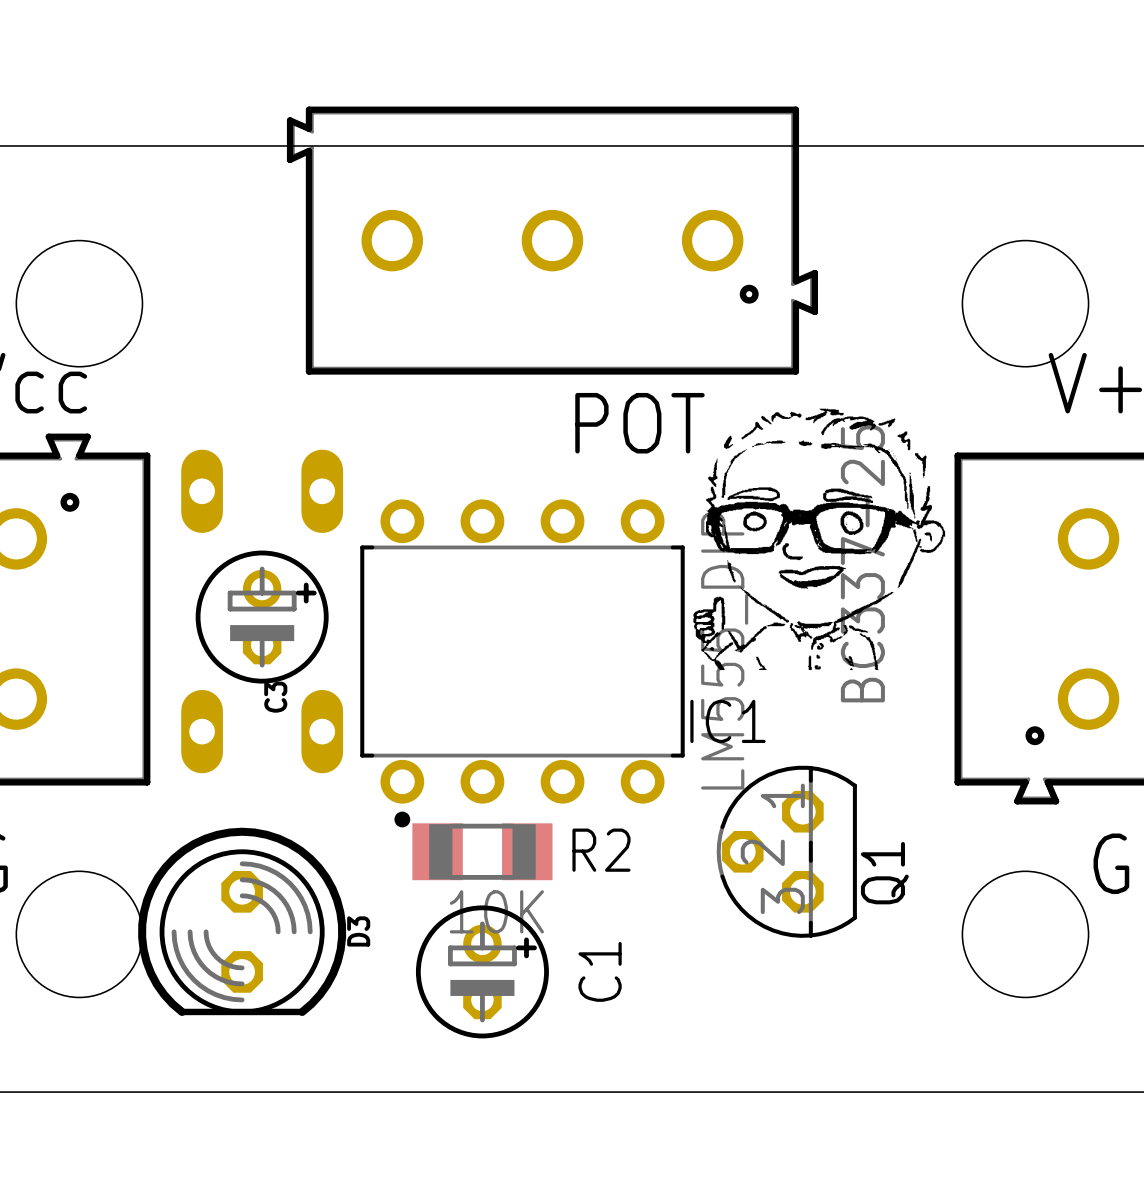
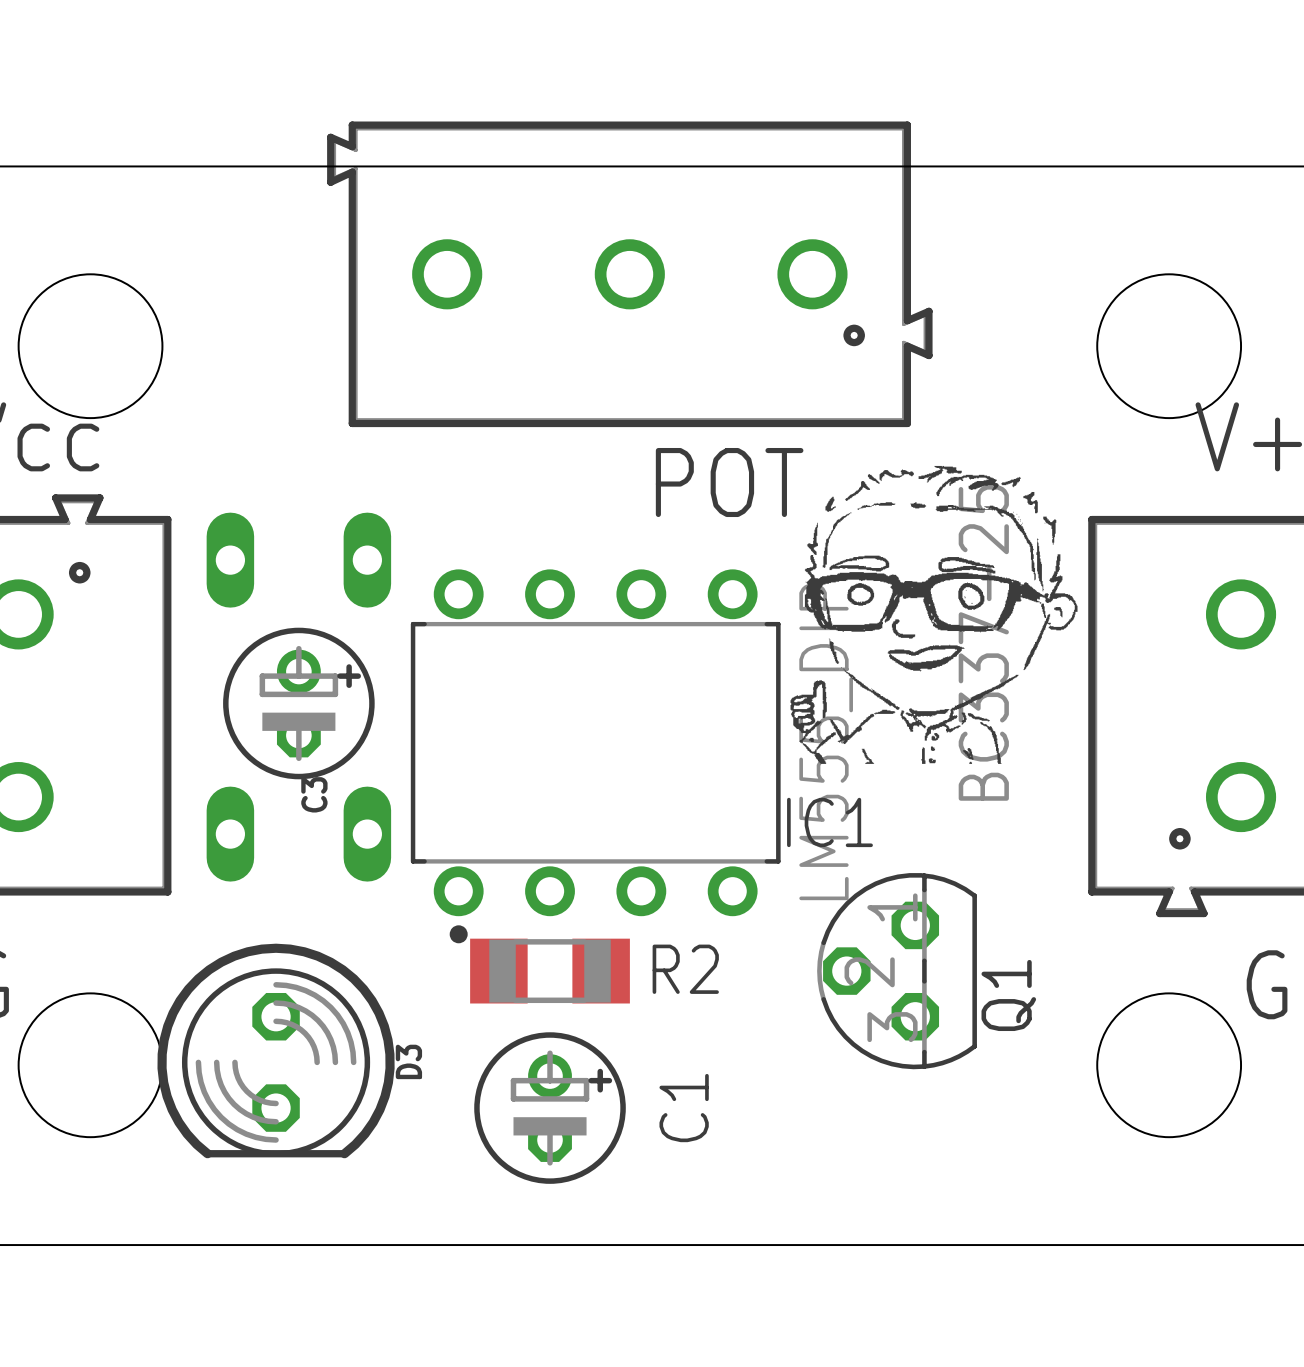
R2 value: 10K (496, 911) -> none

